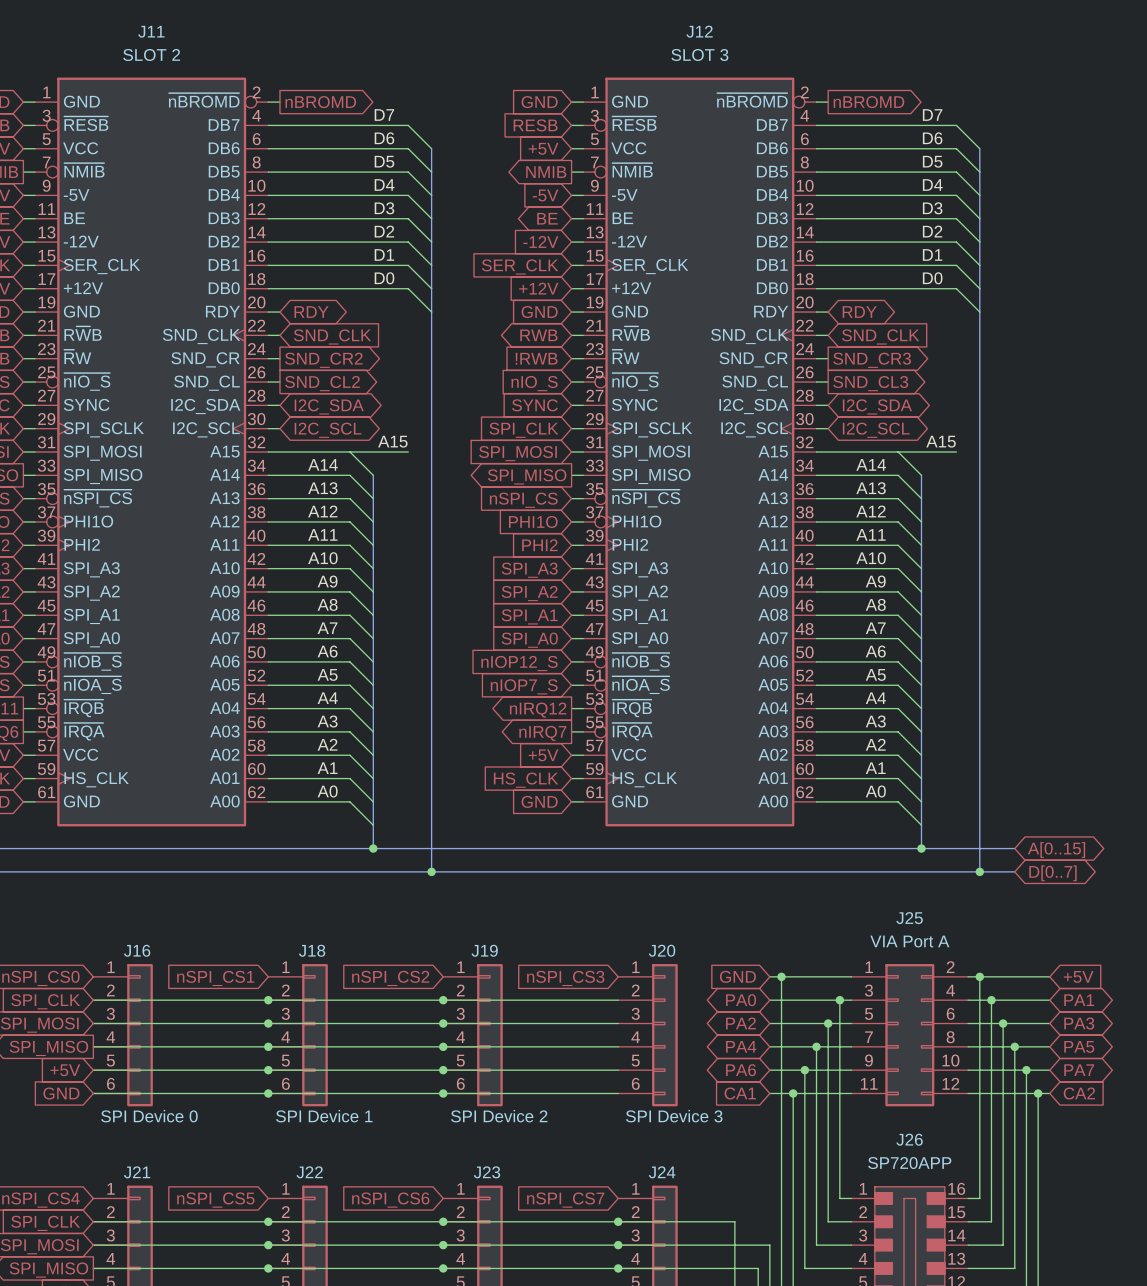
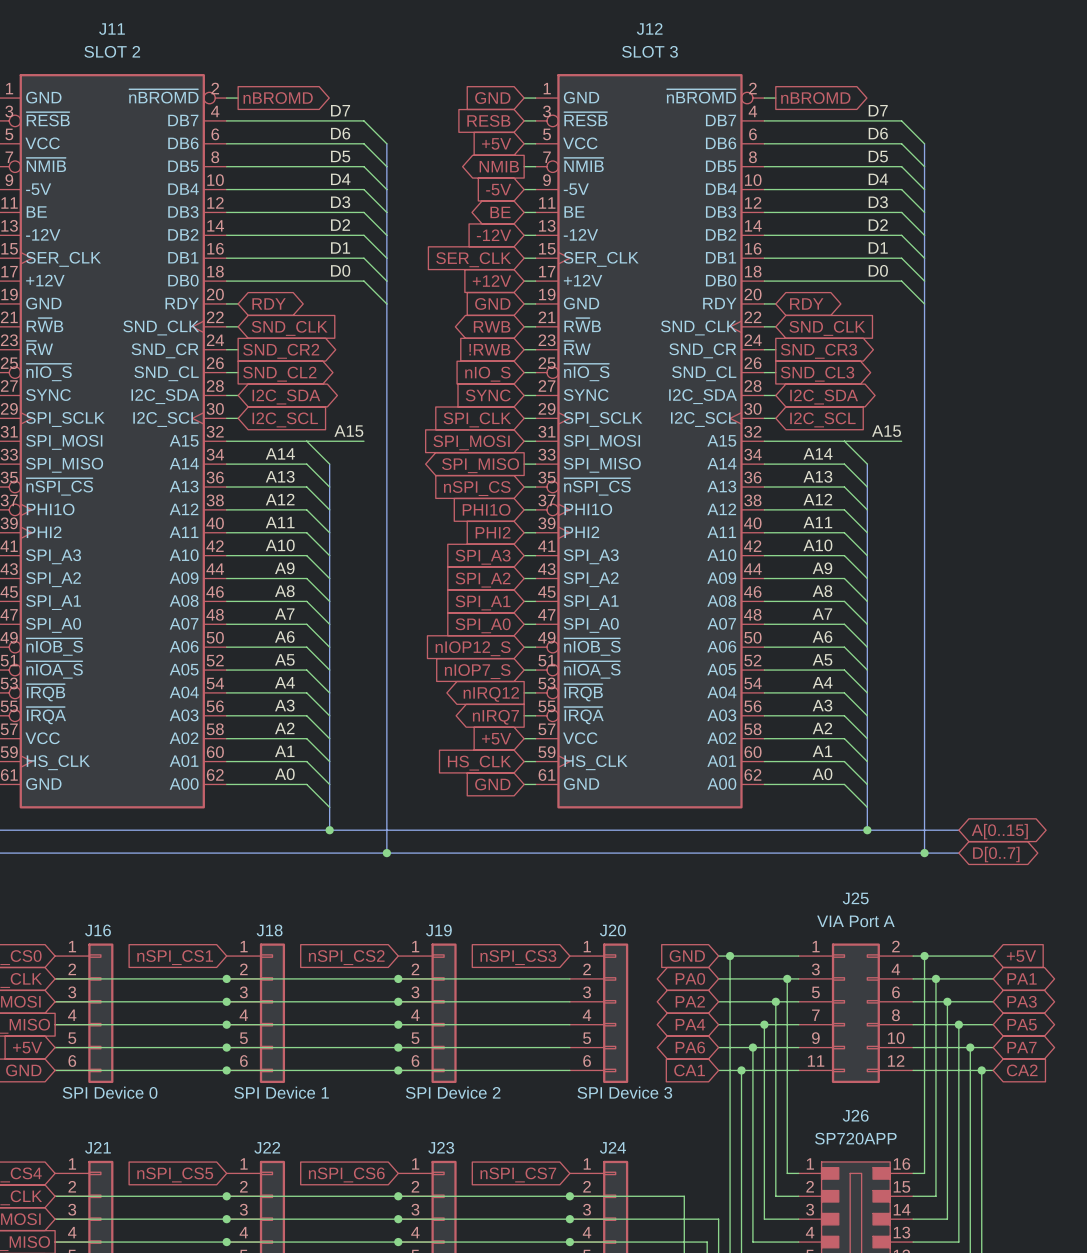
global label shape: bidirectional (328, 430) -> input (285, 419)
global label shape: bidirectional (876, 430) -> input (822, 419)

